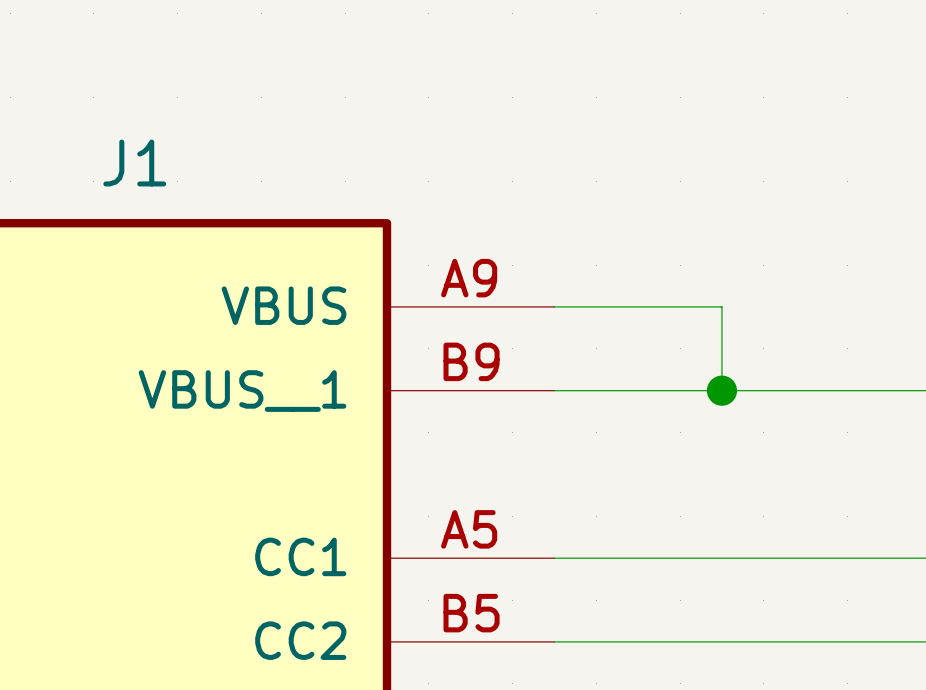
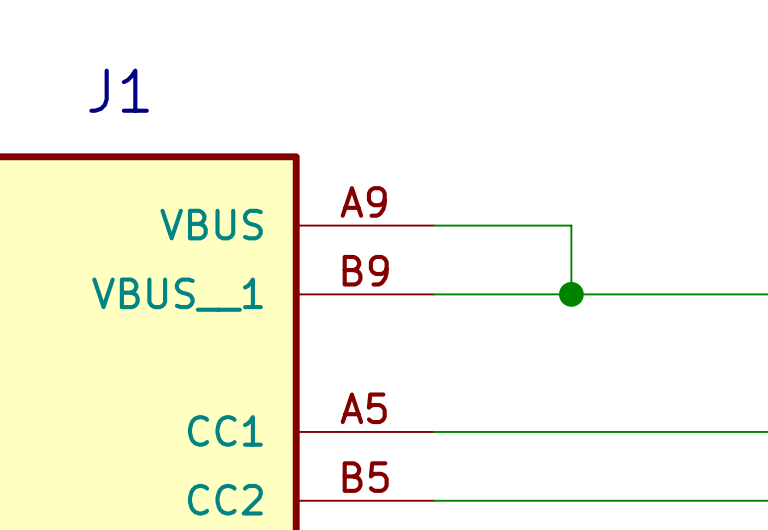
text: none -> J1 (119, 90)
J1 name: J1 (134, 163) -> none

